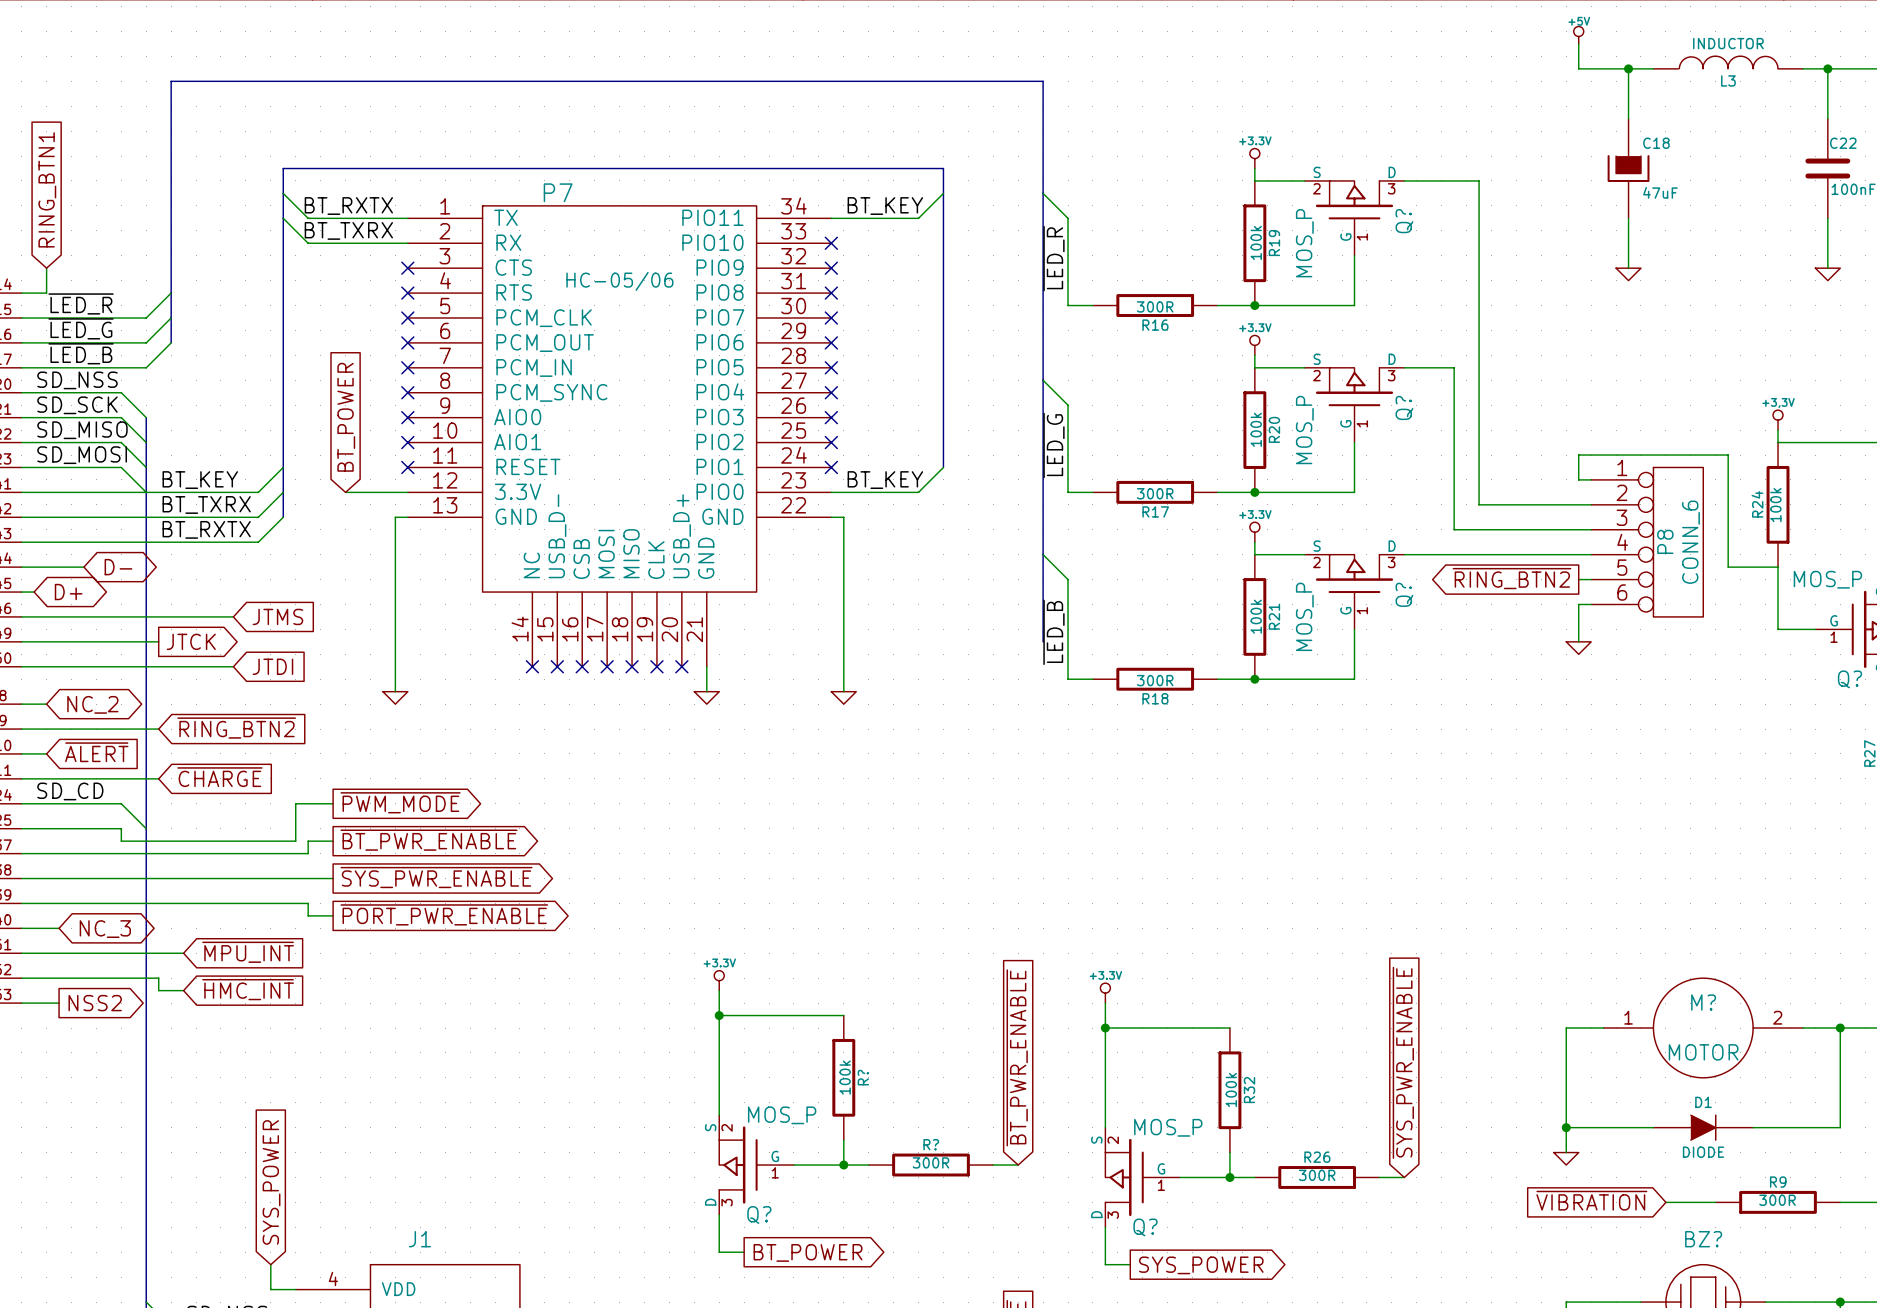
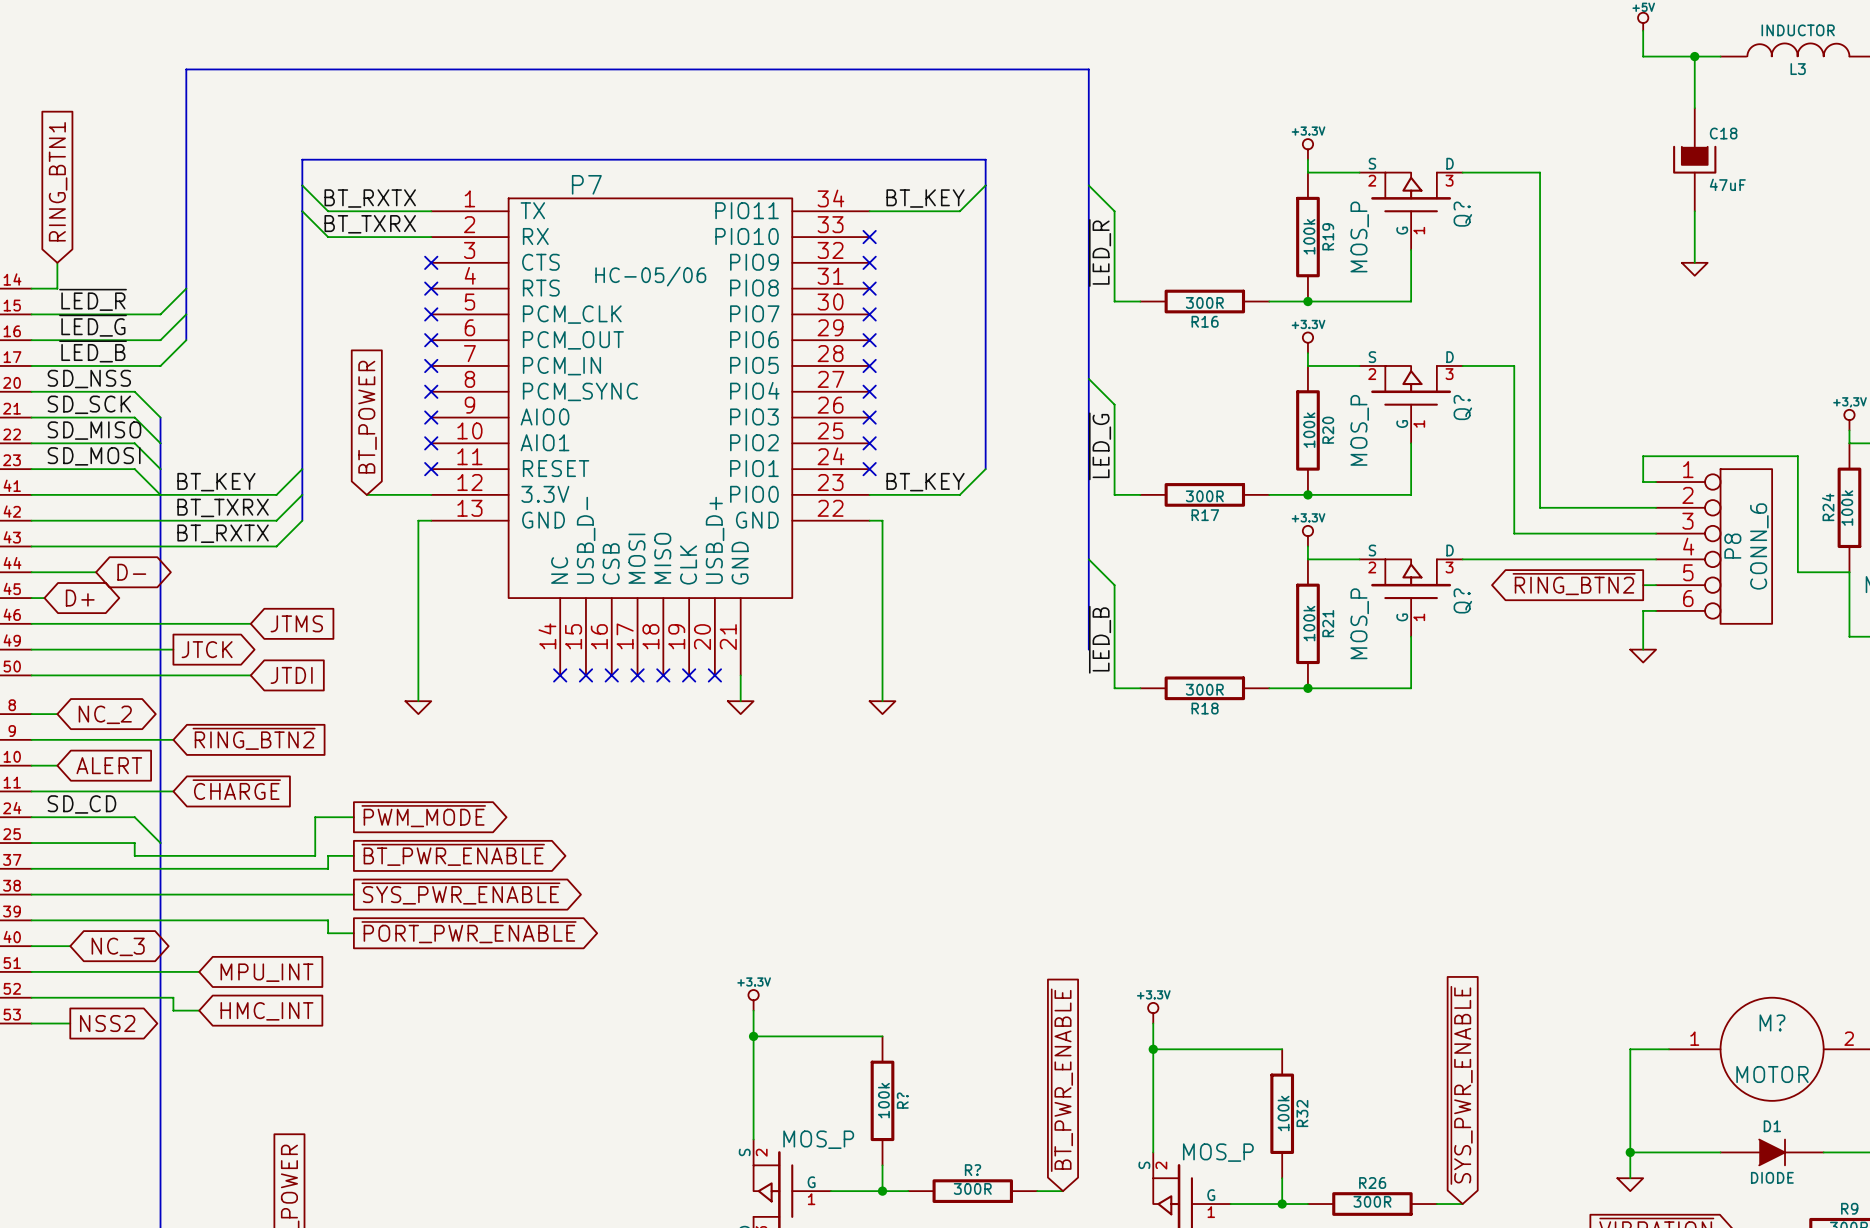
global label: ~{ALERT} (96, 752) -> ALERT (109, 765)
global label: ~{MPU_INT} (248, 952) -> MPU_INT (266, 972)
global label: ~{HMC_INT} (248, 989) -> HMC_INT (266, 1011)

